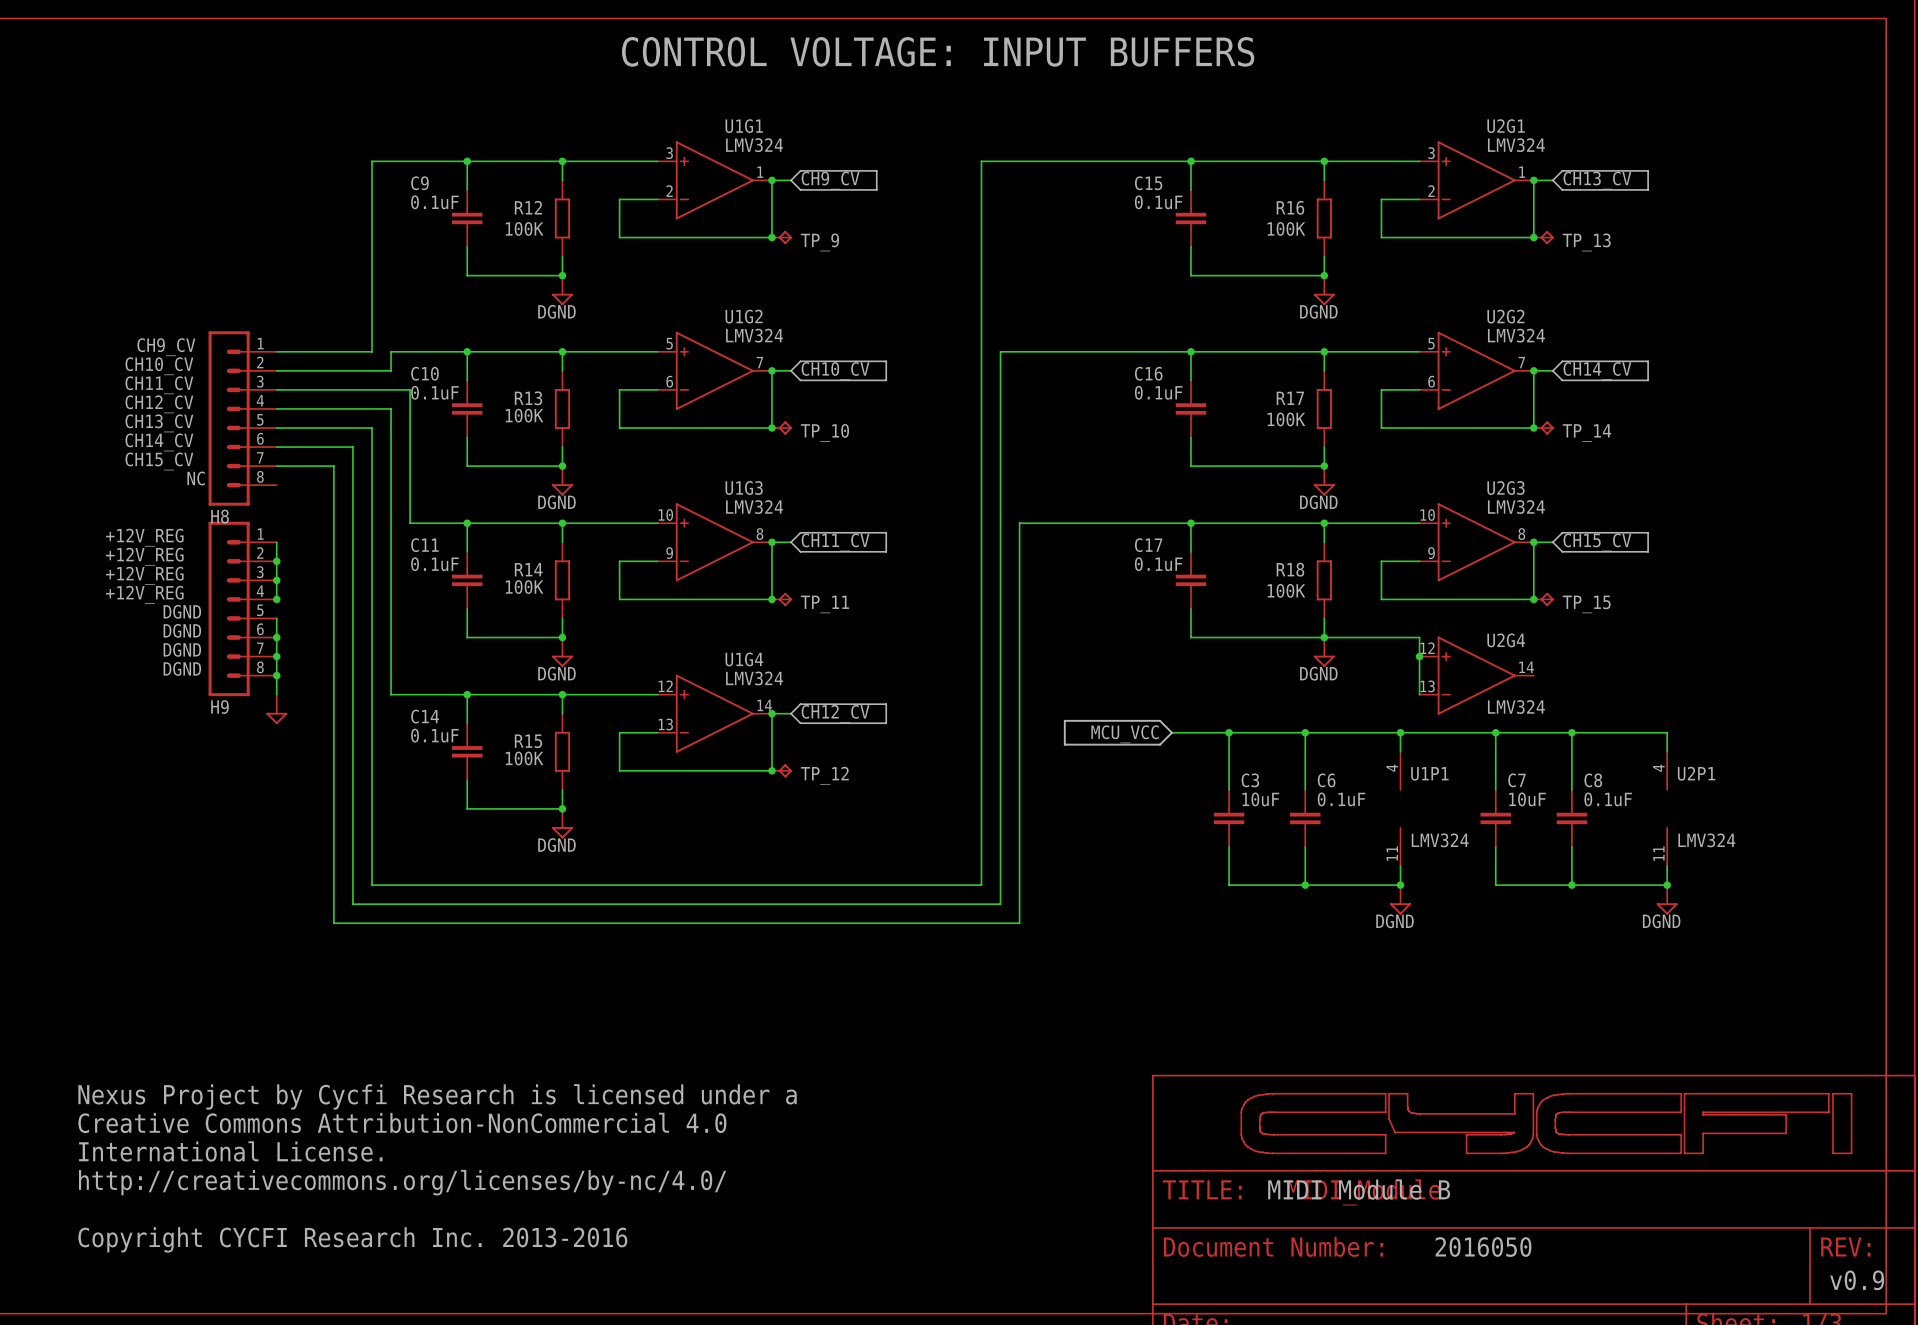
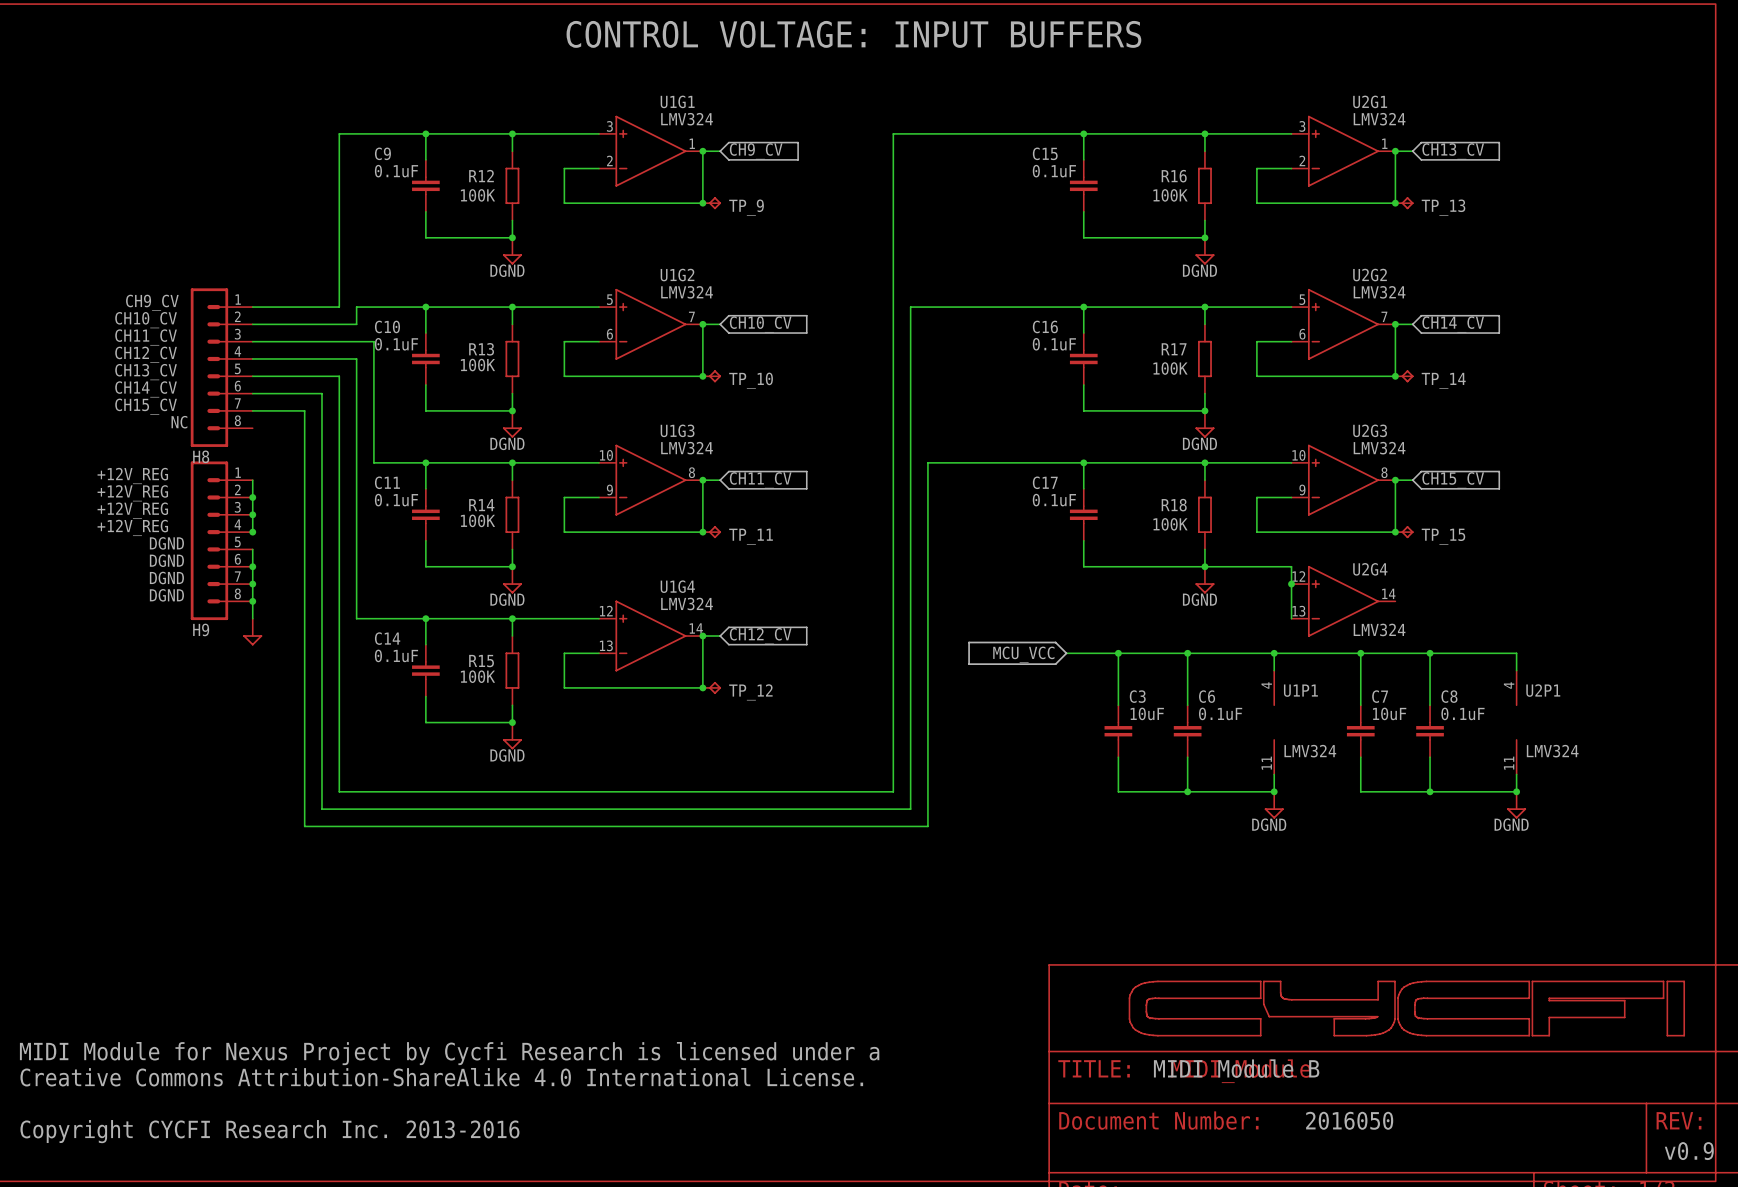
text: Nexus Project by Cycfi Research is licensed under a (437, 1096) -> none
text: Creative Commons Attribution-NonCommercial 4.0 (402, 1122) -> none
text: International License. (230, 1151) -> none
text: none -> MIDI Module for Nexus Project by Cycfi Research is licensed under a (449, 1053)
text: http://creativecommons.org/licenses/by-nc/4.0/ (402, 1182) -> none
text: none -> Creative Commons Attribution-ShareAlike 4.0 International License. (441, 1077)
text position: Copyright CYCFI Research Inc. 2013-2016 (352, 1239) -> Copyright CYCFI Research Inc. 2013-2016 (269, 1131)

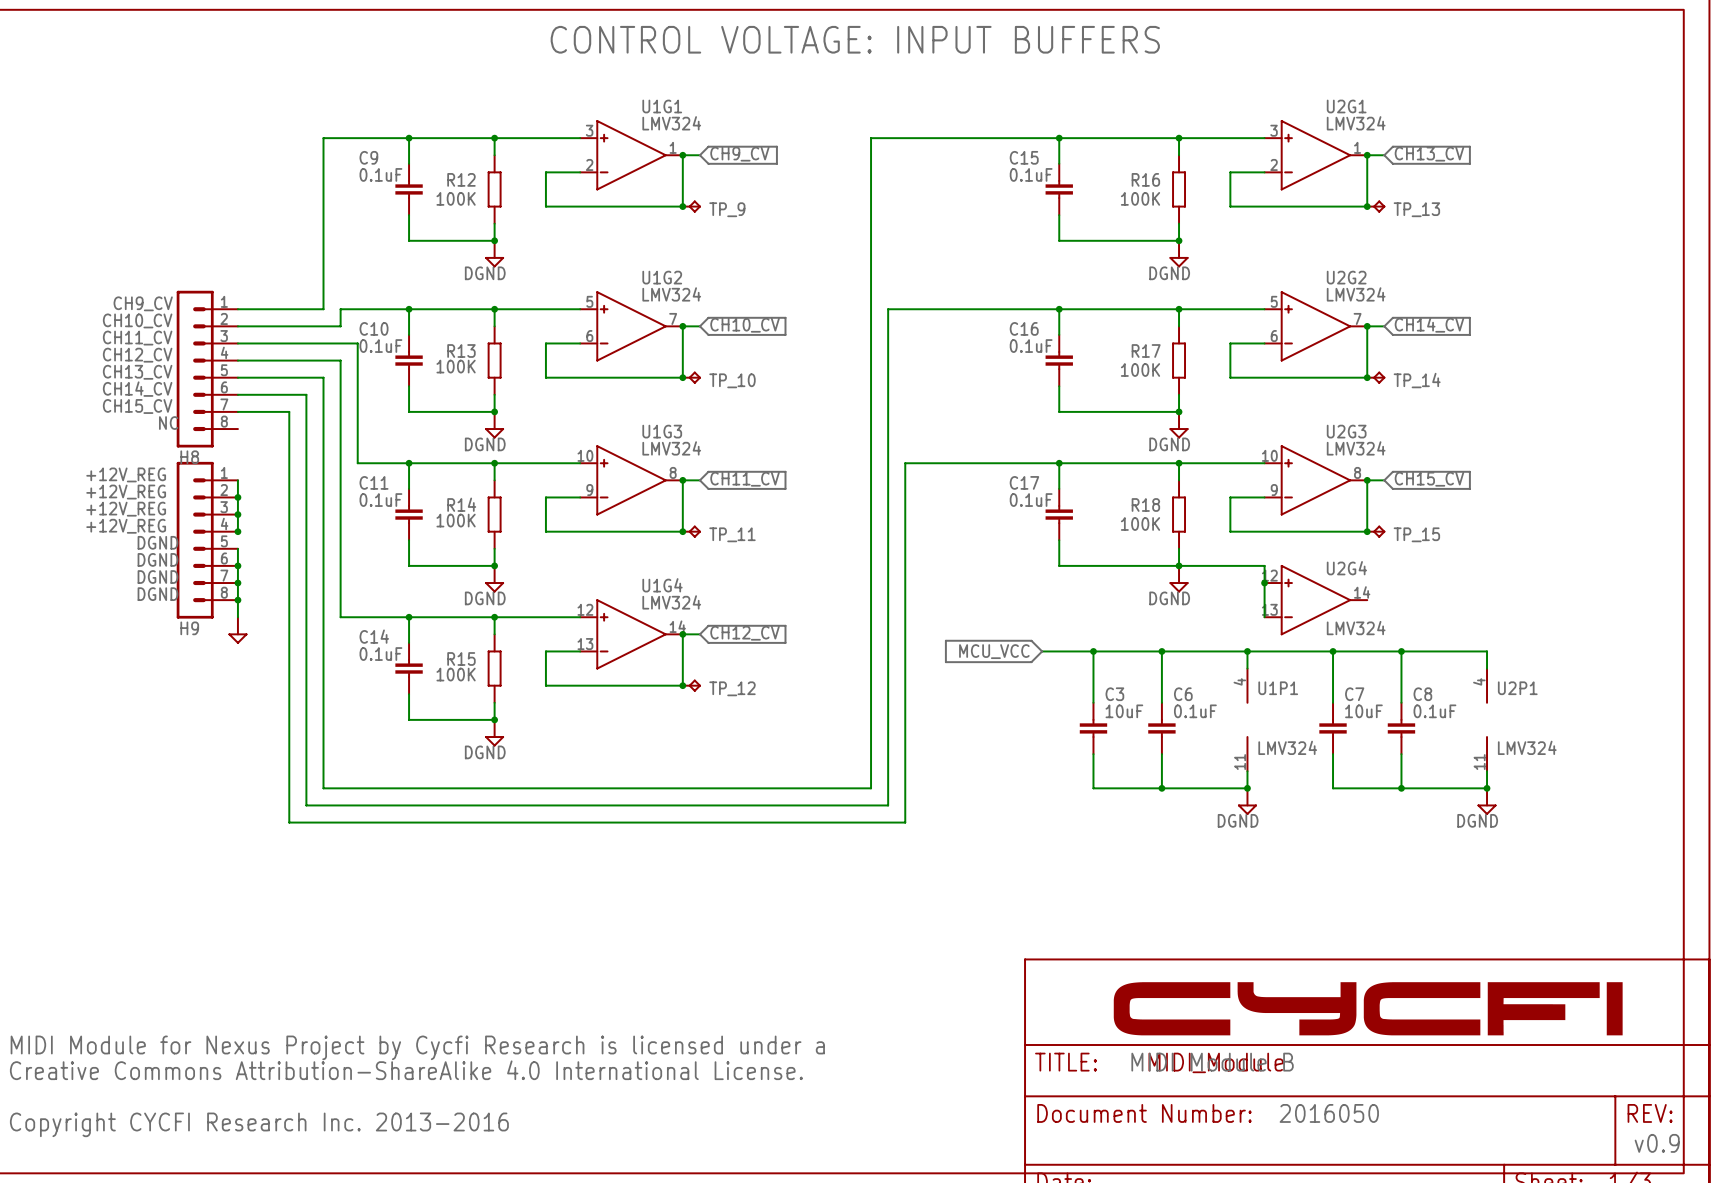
line: (1263, 981) (1280, 981) (1281, 996) (1291, 999) (1378, 999) (1378, 981) (1395, 981) (1394, 1022) (1388, 1029) (1379, 1034) (1334, 1035) (1334, 1018) (1369, 1018) (1377, 1016) (1269, 1016) (1263, 1004) (1263, 981) -> none
line: (1532, 981) (1663, 981) (1663, 998) (1549, 998) (1549, 1000) (1624, 1000) (1624, 1017) (1549, 1017) (1549, 1035) (1532, 1035) (1532, 981) -> none
line: (1667, 981) (1684, 981) (1684, 1035) (1667, 1035) (1667, 981) -> none
drawing: none -> [1113, 982, 1623, 1036]
line: (1146, 1014) (1146, 1002) (1149, 998) (1260, 998) (1260, 981) (1153, 981) (1135, 987) (1129, 998) (1130, 1022) (1135, 1029) (1144, 1034) (1260, 1035) (1260, 1018) (1149, 1018) (1146, 1014) -> none
line: (1415, 1014) (1415, 1002) (1418, 998) (1529, 998) (1529, 981) (1421, 981) (1404, 987) (1398, 998) (1398, 1022) (1404, 1029) (1413, 1034) (1529, 1035) (1529, 1018) (1418, 1018) (1415, 1014) -> none

